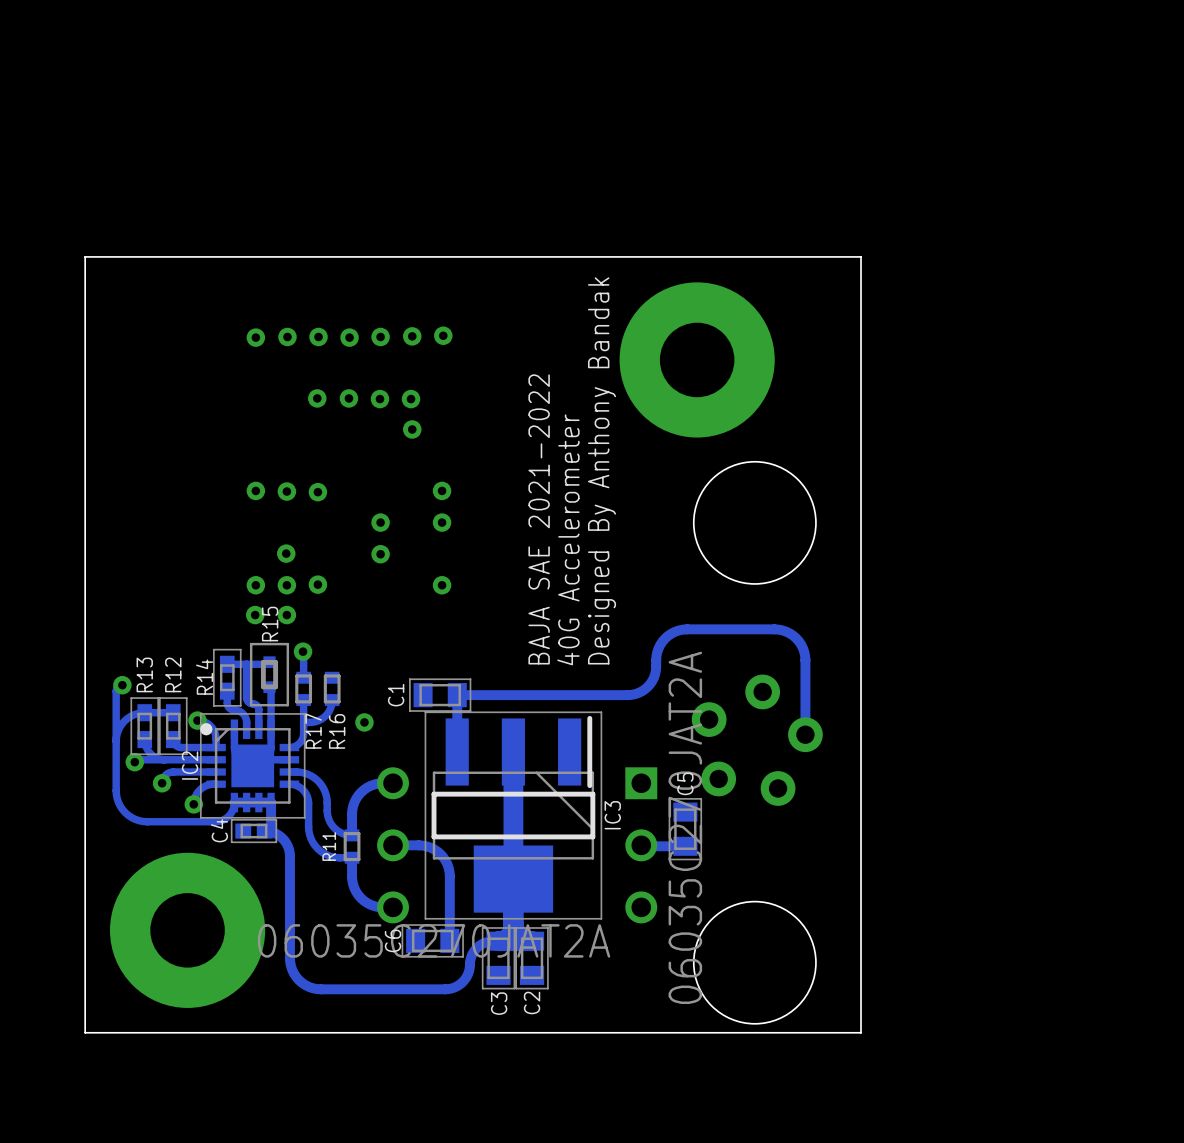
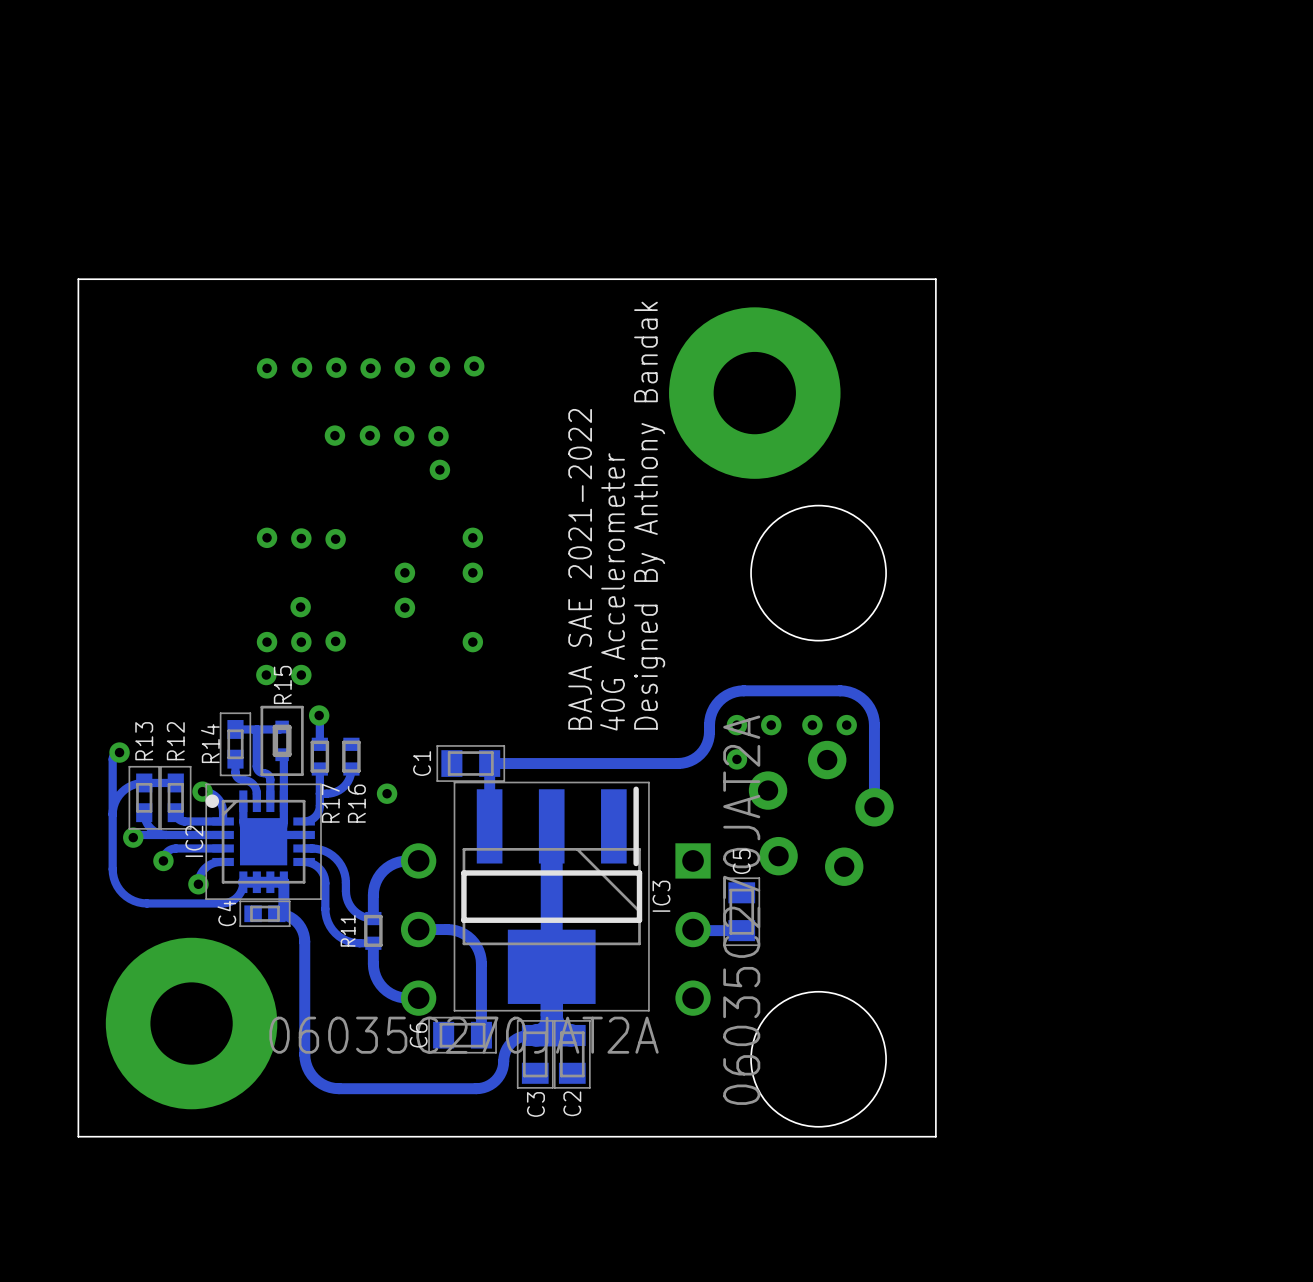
via: none -> (736, 725)
via: none -> (771, 725)
via: none -> (812, 725)
via: none -> (846, 725)
via: none -> (736, 759)

